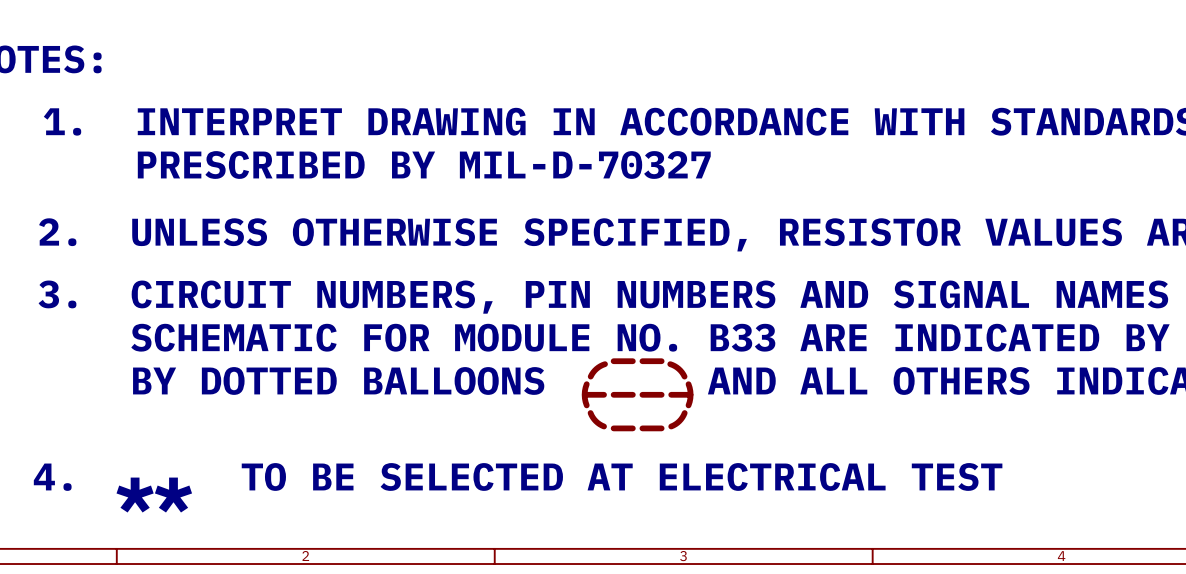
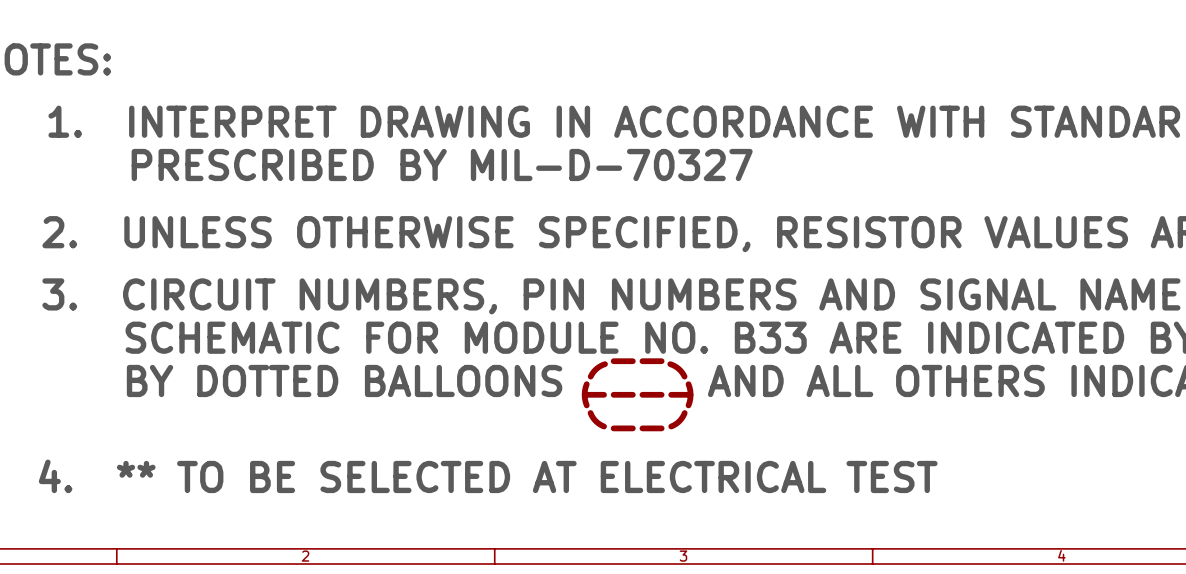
text: 4. TO BE SELECTED AT ELECTRICAL TEST (518, 476) -> 4. ** TO BE SELECTED AT ELECTRICAL TEST (488, 476)
text: * (135, 495) -> none
text: * (173, 495) -> none

